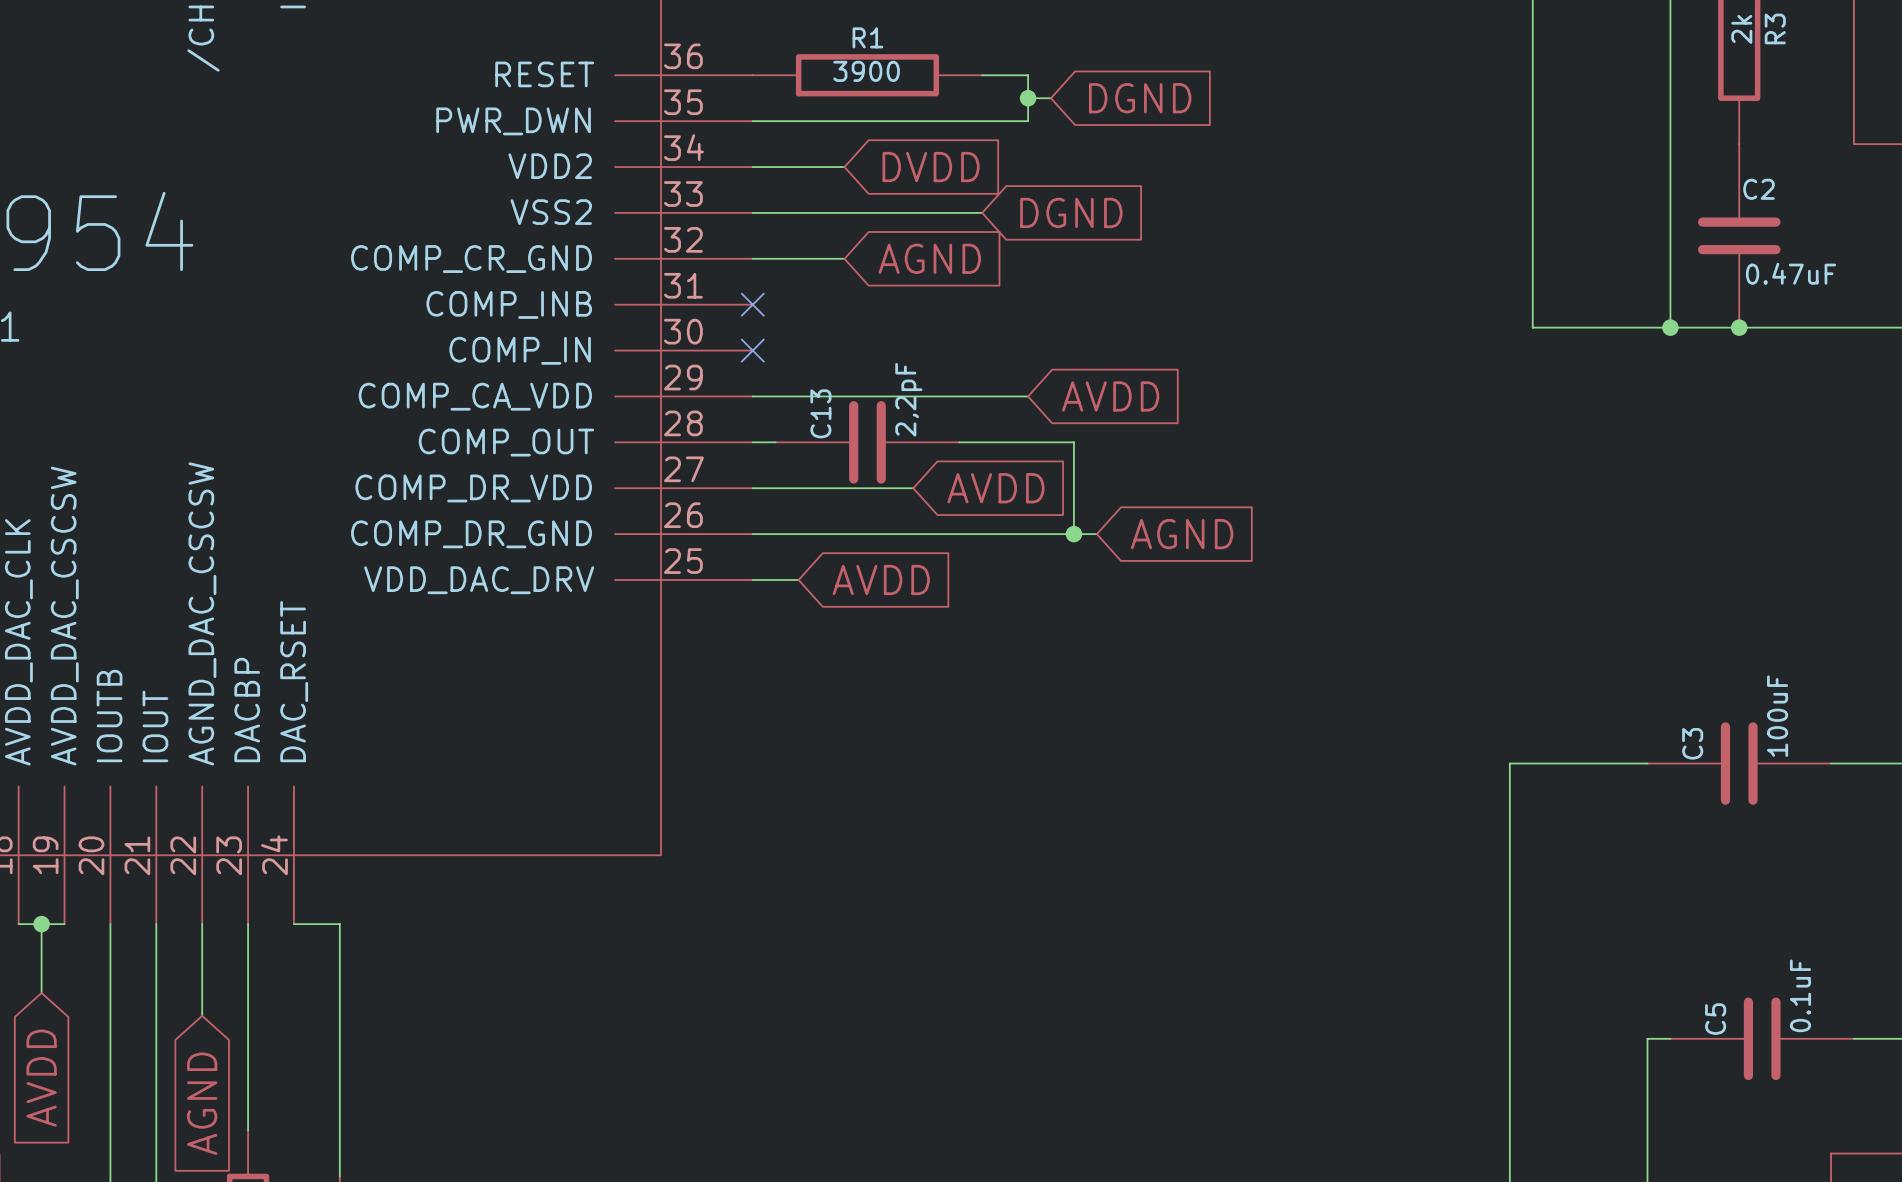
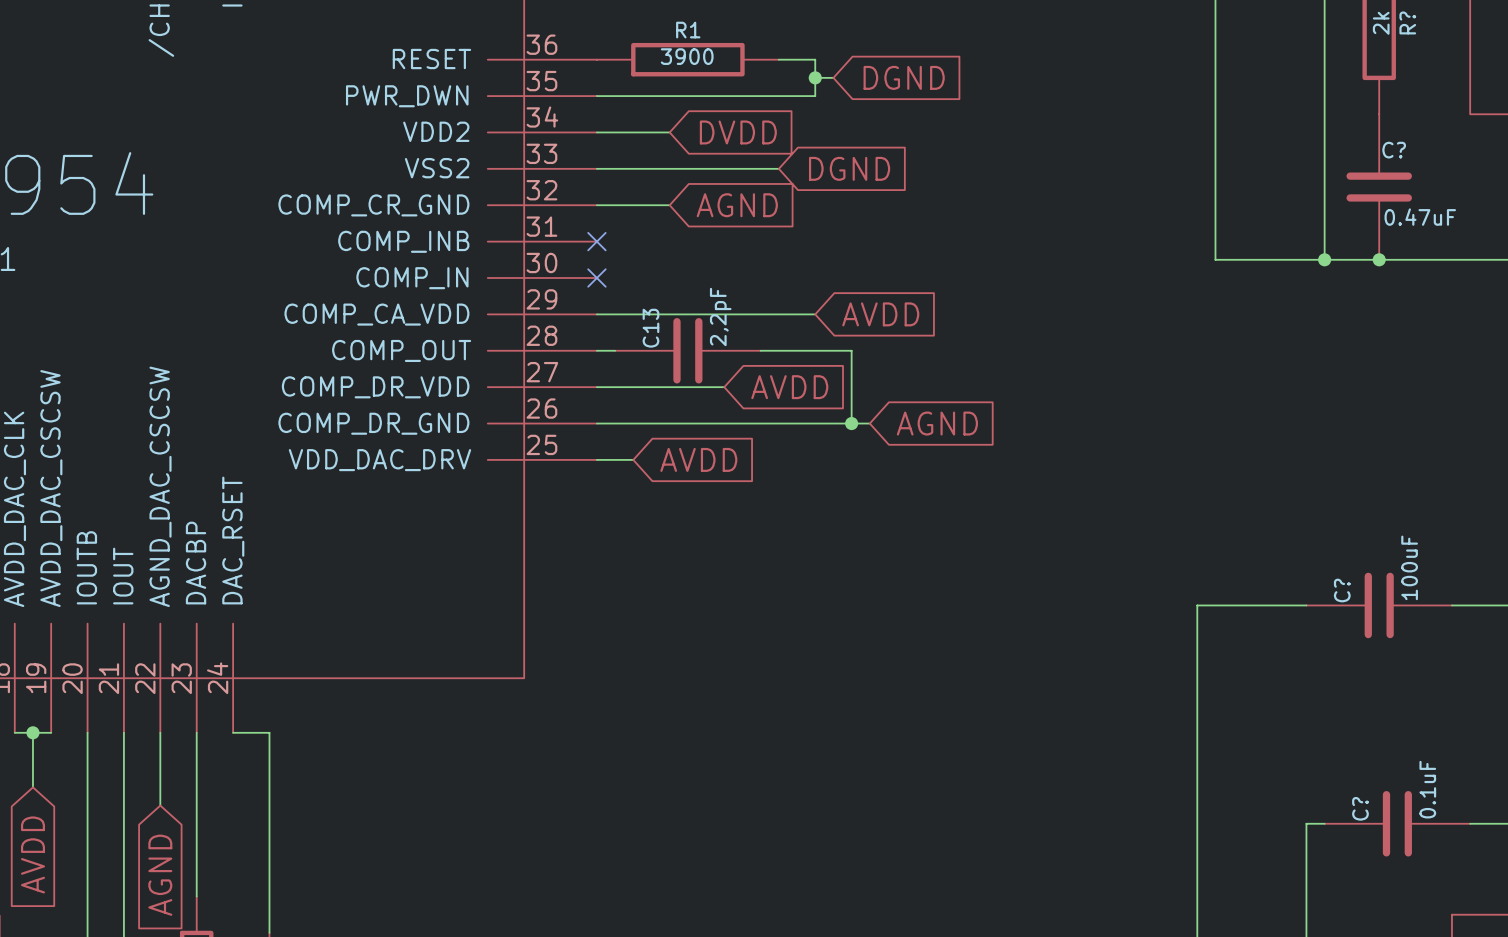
R3 name: R3 (1775, 28) -> R? (1407, 22)
C2 name: C2 (1758, 189) -> C? (1394, 150)
C3 name: C3 (1692, 743) -> C? (1342, 590)
C5 name: C5 (1715, 1019) -> C? (1360, 808)

